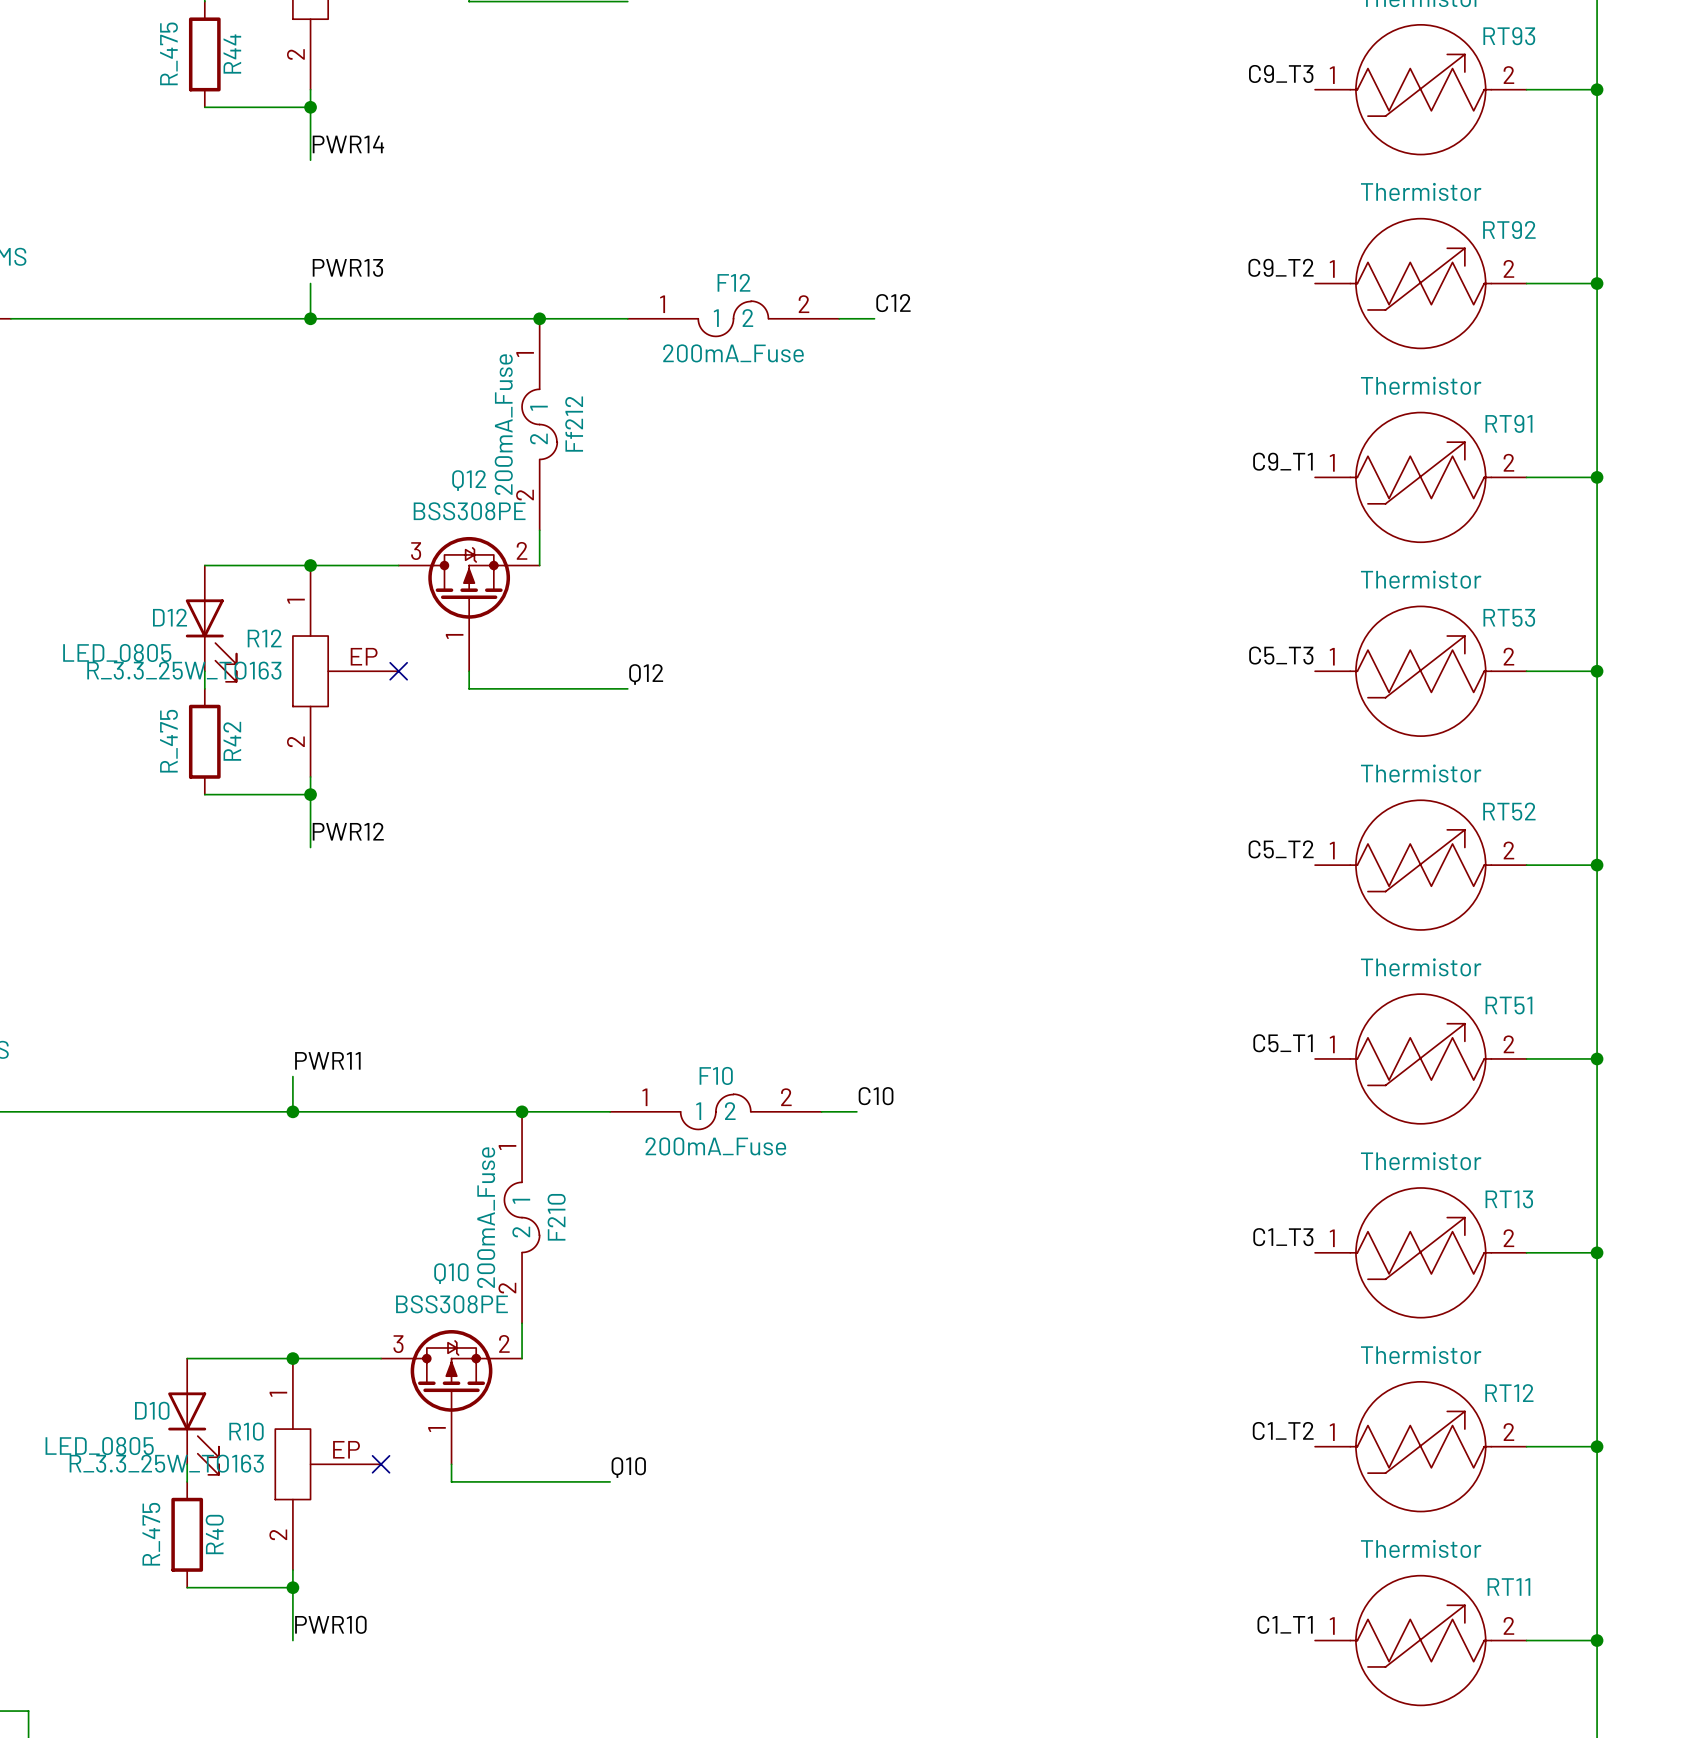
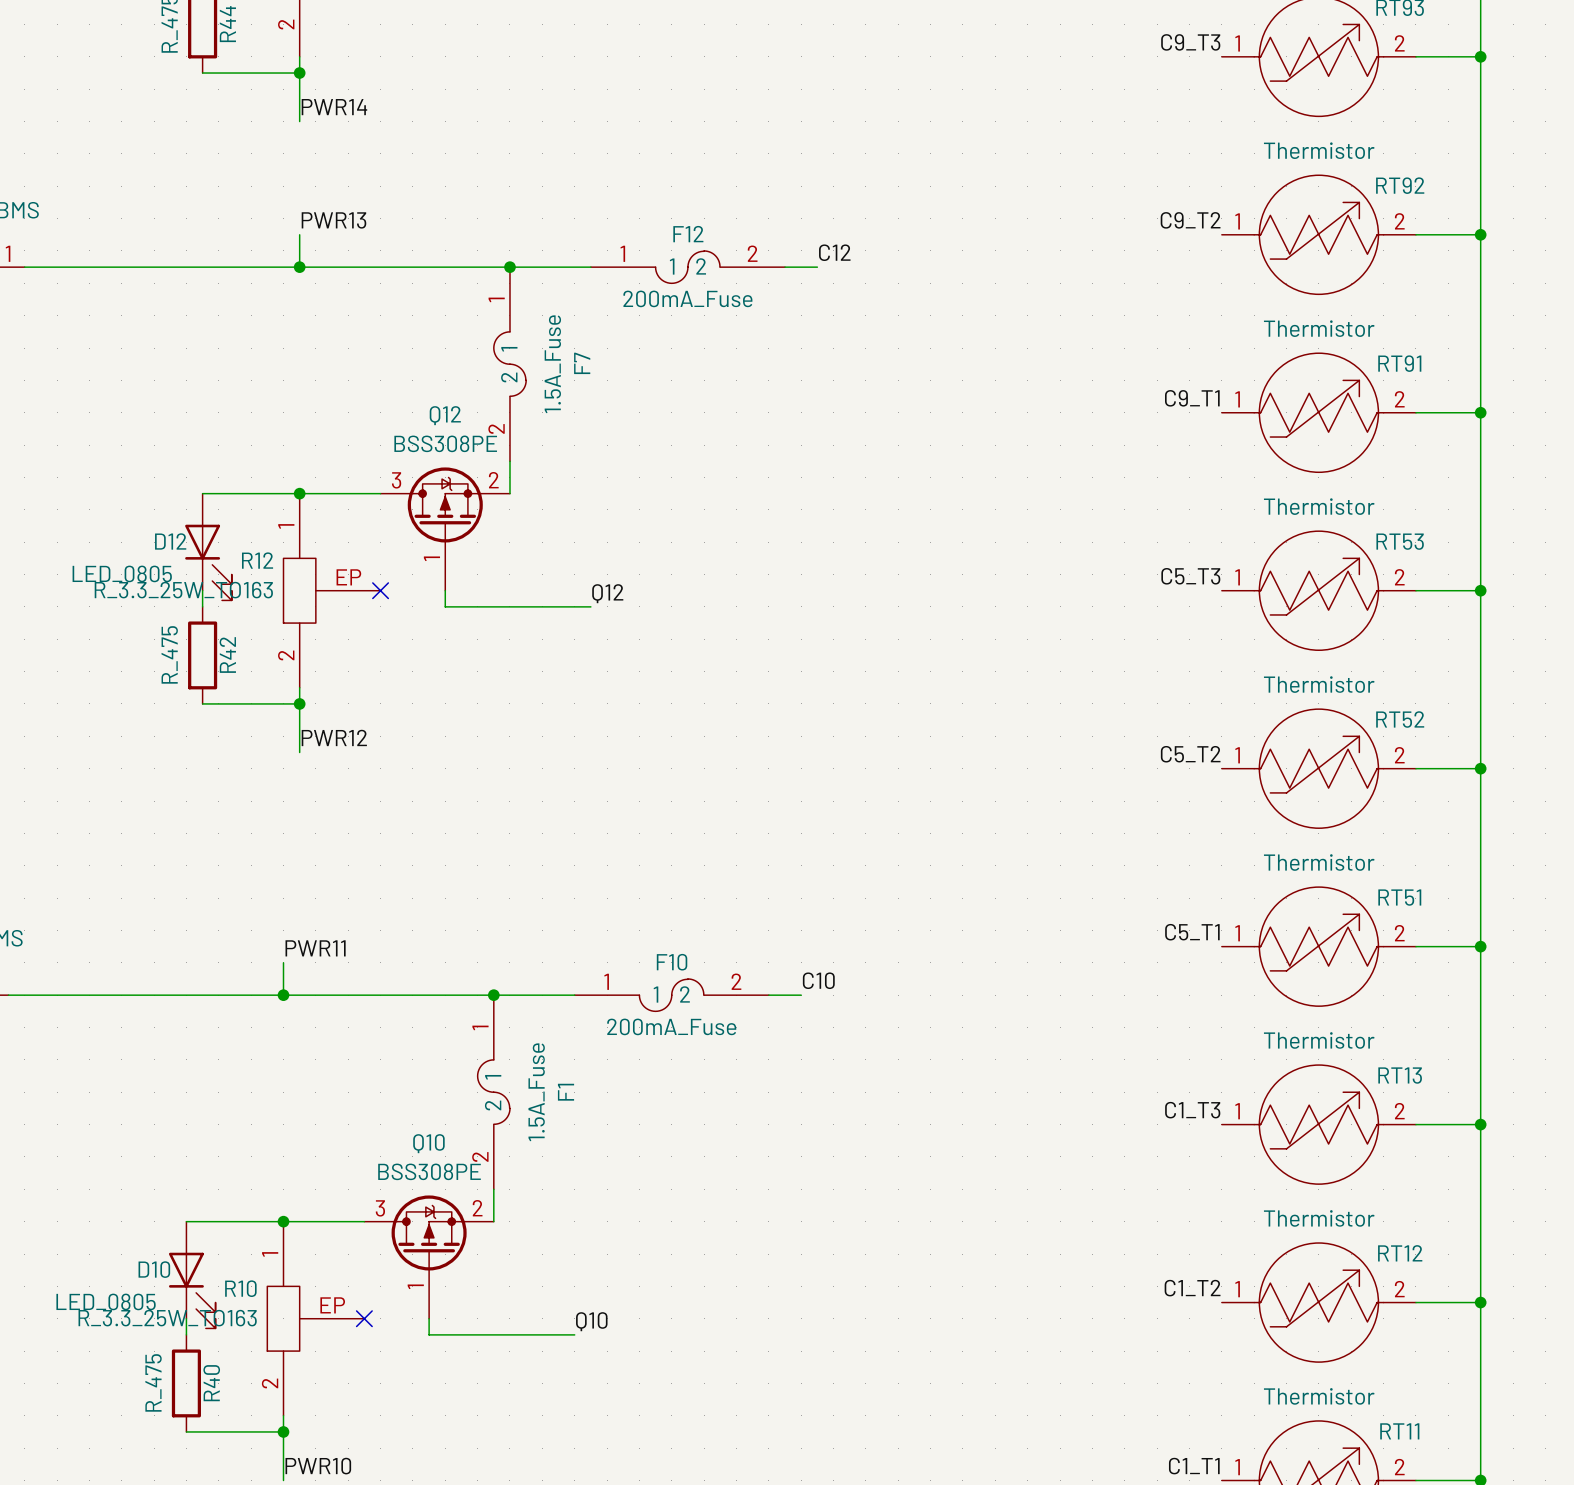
Ff212 value: 200mA_Fuse (503, 424) -> 1.5A_Fuse (552, 364)
Ff212 name: Ff212 (574, 424) -> F7 (582, 363)
F210 value: 200mA_Fuse (486, 1217) -> 1.5A_Fuse (536, 1092)
F210 name: F210 (556, 1217) -> F1 (566, 1092)

